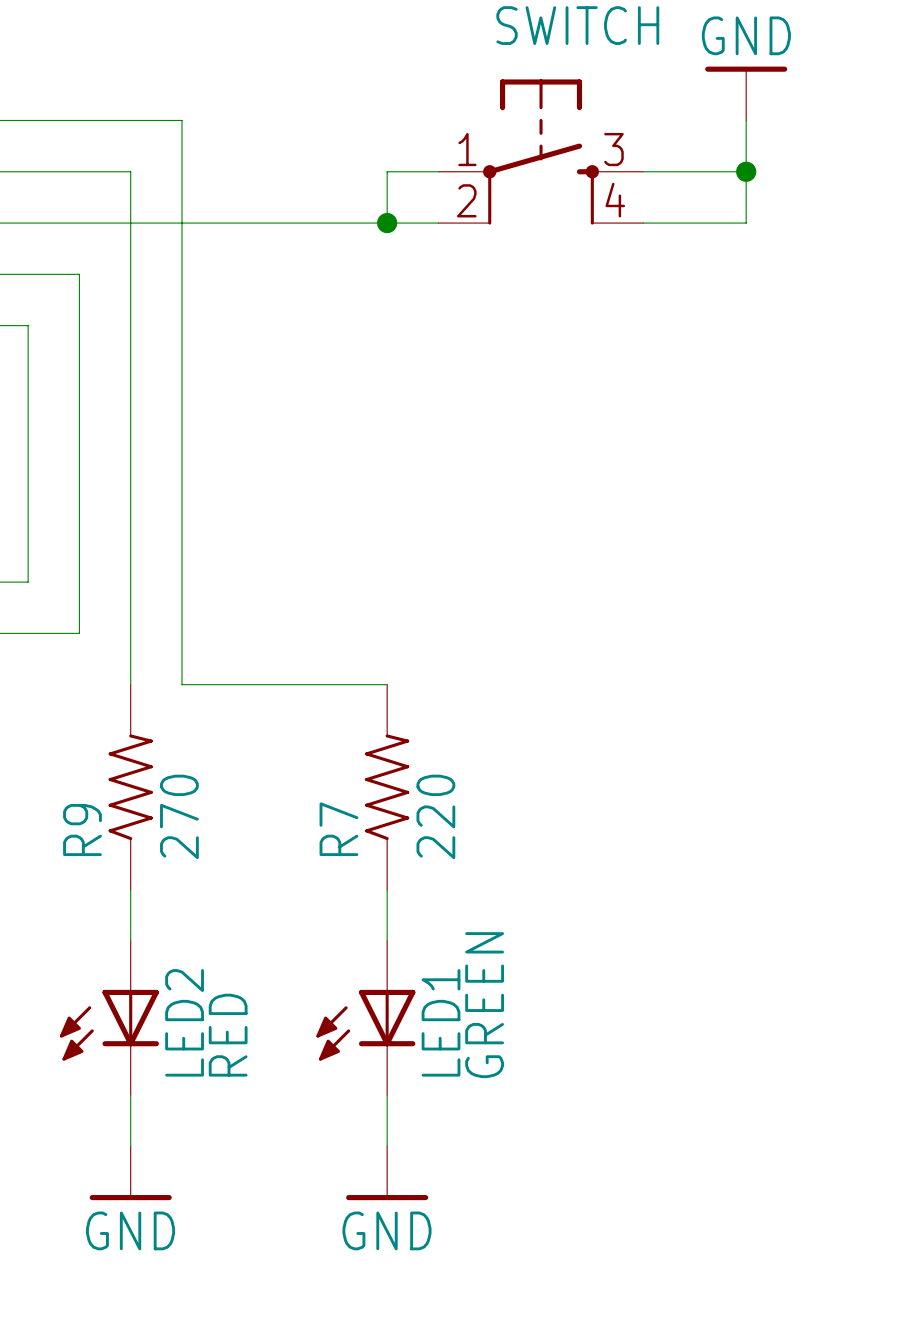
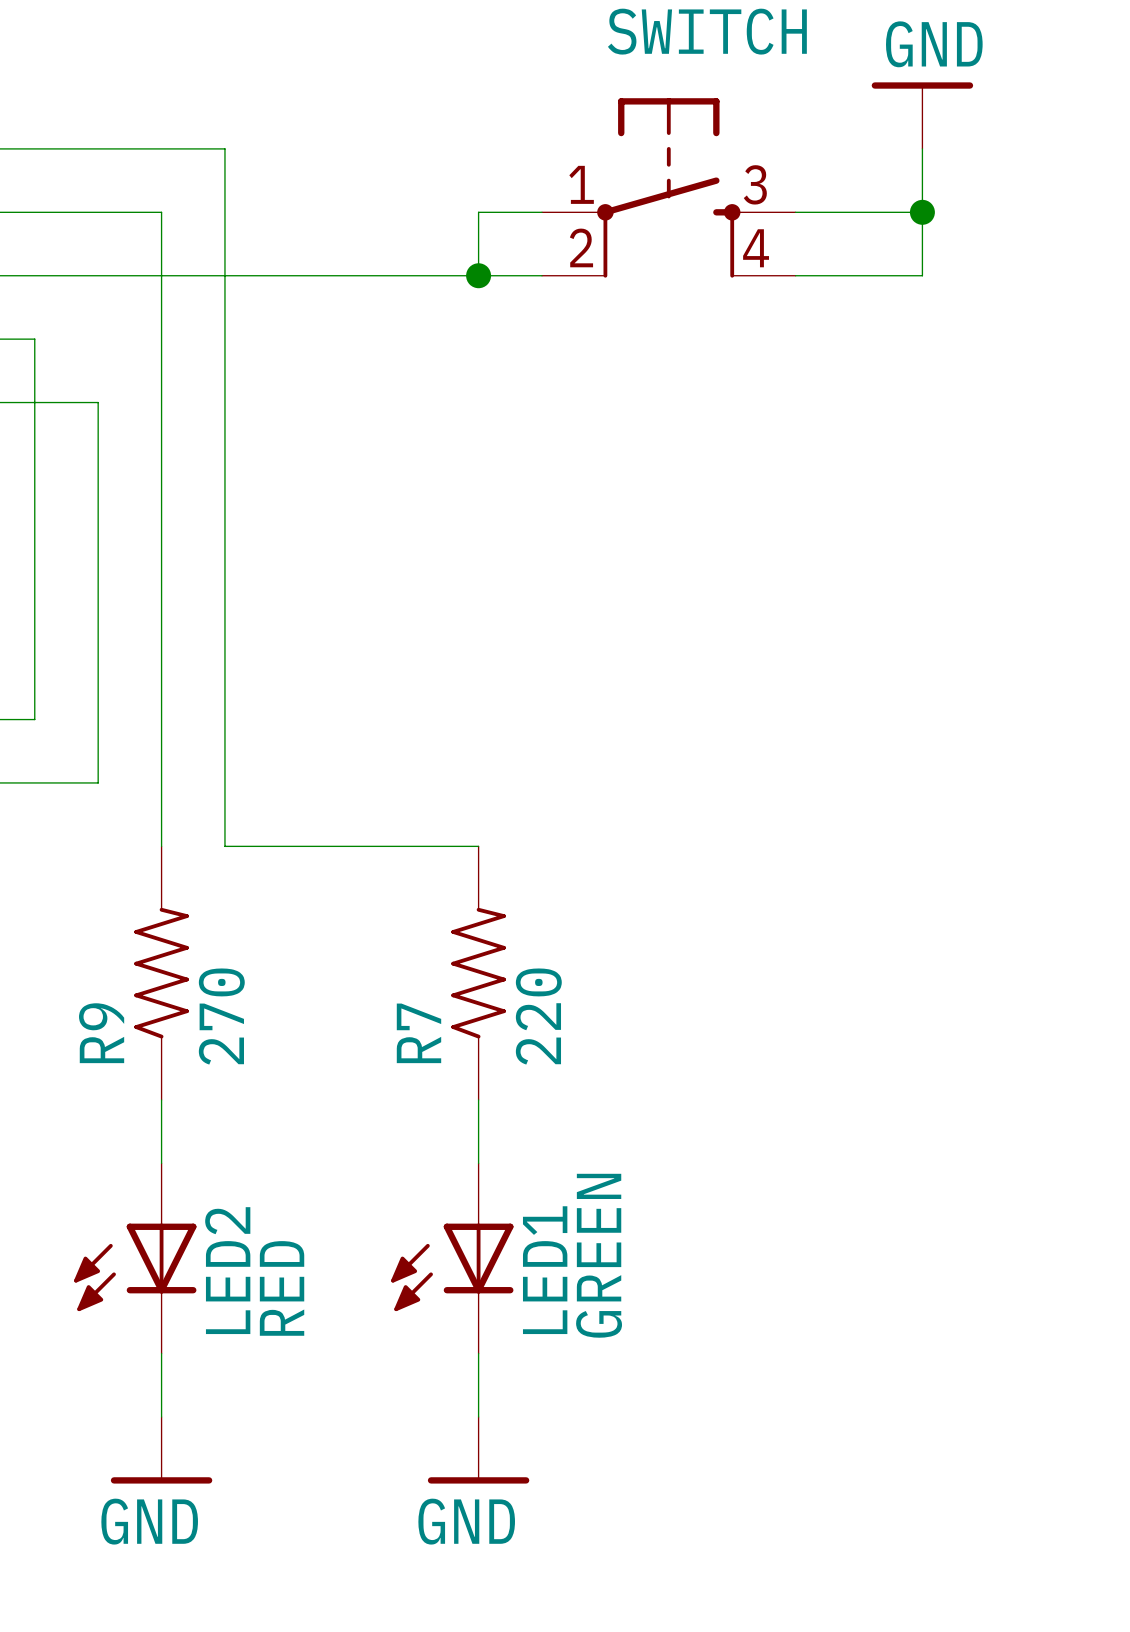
wire: (28, 274) (79, 274) (79, 325) -> (34, 339) (34, 402) (98, 402)

